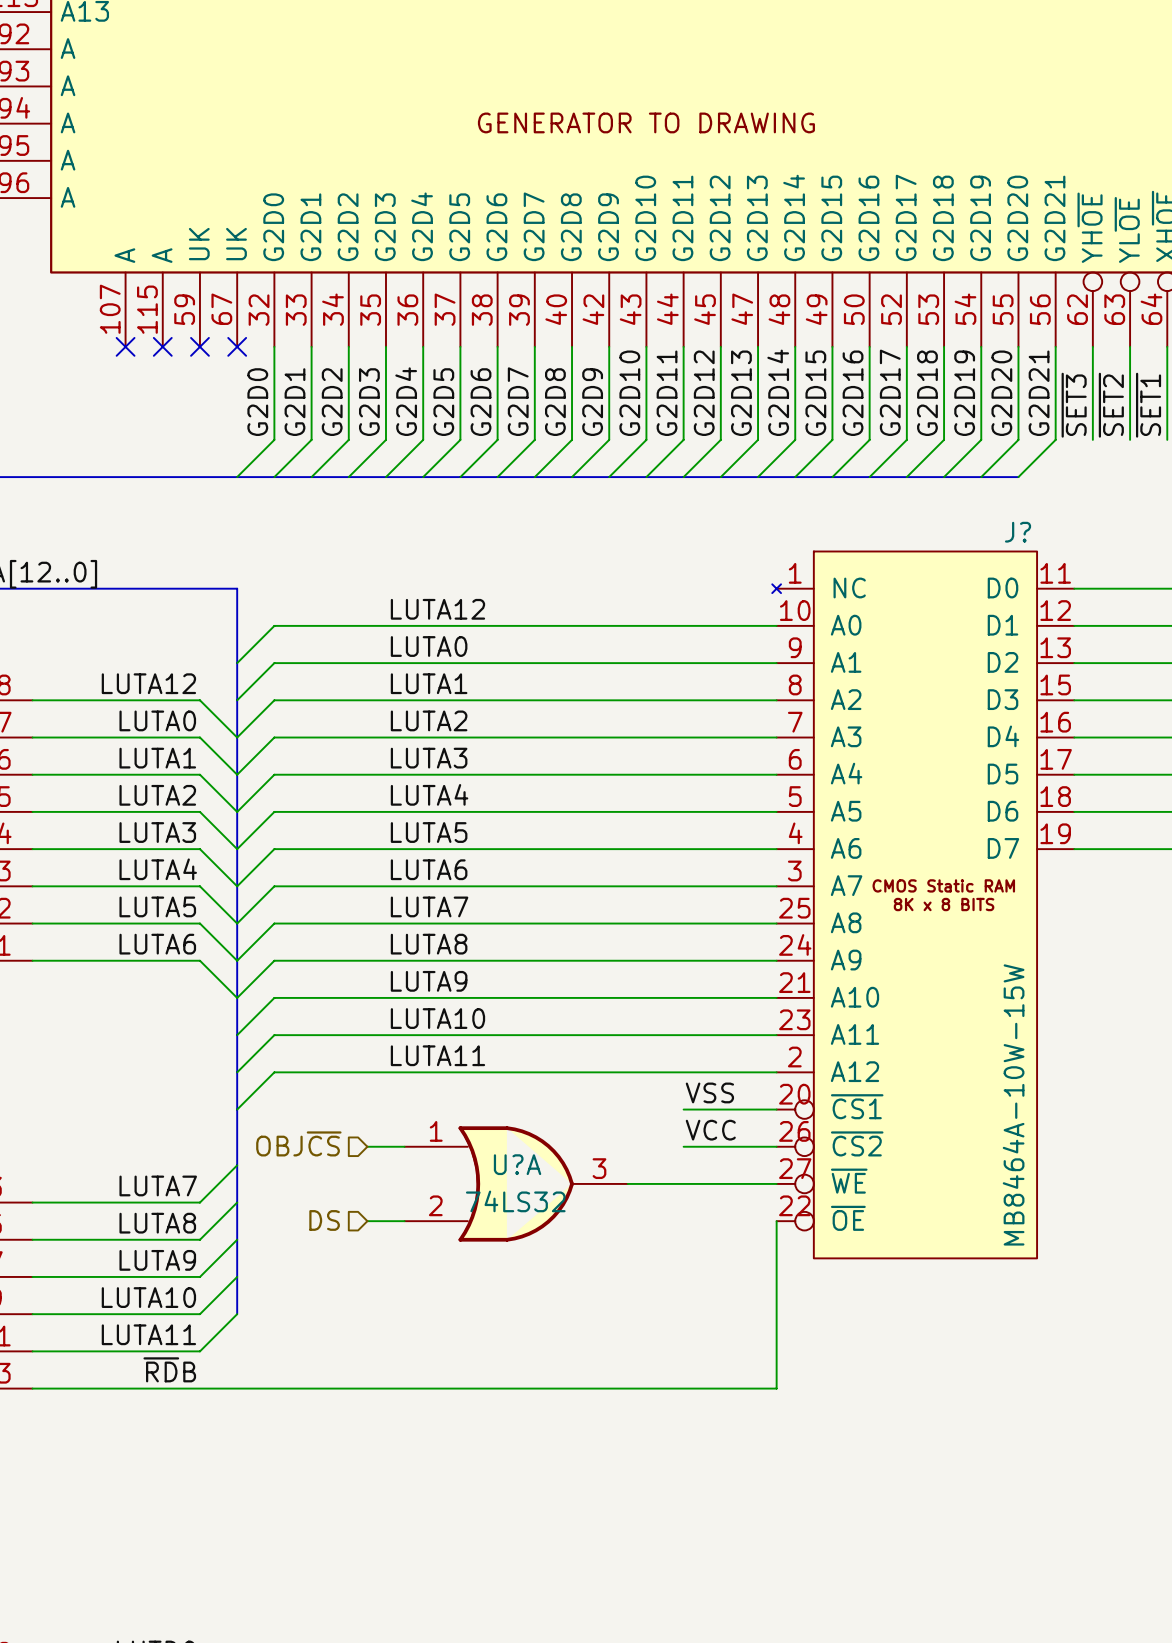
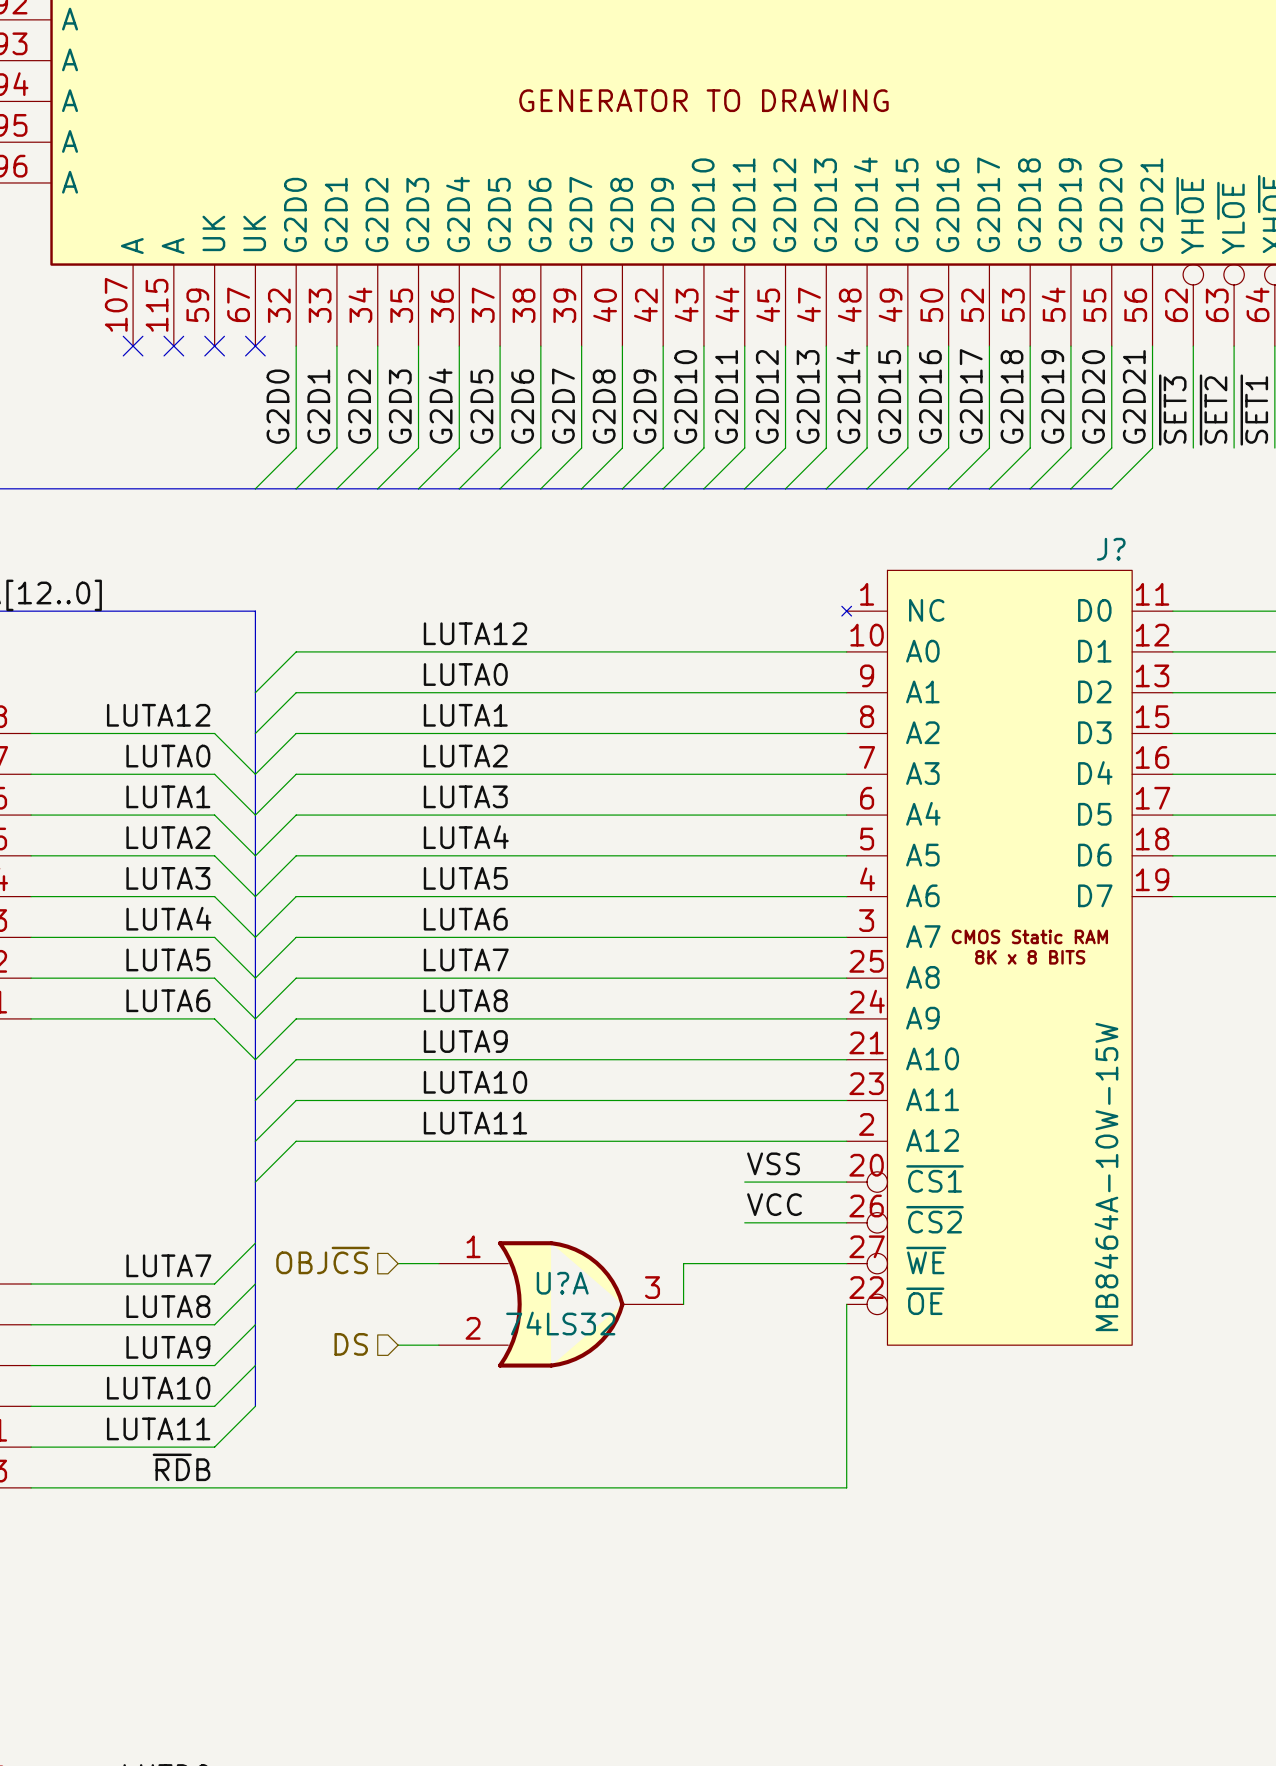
hierarchical label position: OBJ~{CS} (298, 1143) -> OBJ~{CS} (323, 1260)
wire: (367, 1146) (404, 1146) -> (398, 1263) (438, 1263)
U?A position: (516, 1183) -> (561, 1304)
wire: none -> (683, 1263) (683, 1304)
hierarchical label position: DS (324, 1220) -> DS (351, 1344)
wire: (367, 1221) (404, 1221) -> (398, 1345) (438, 1345)

